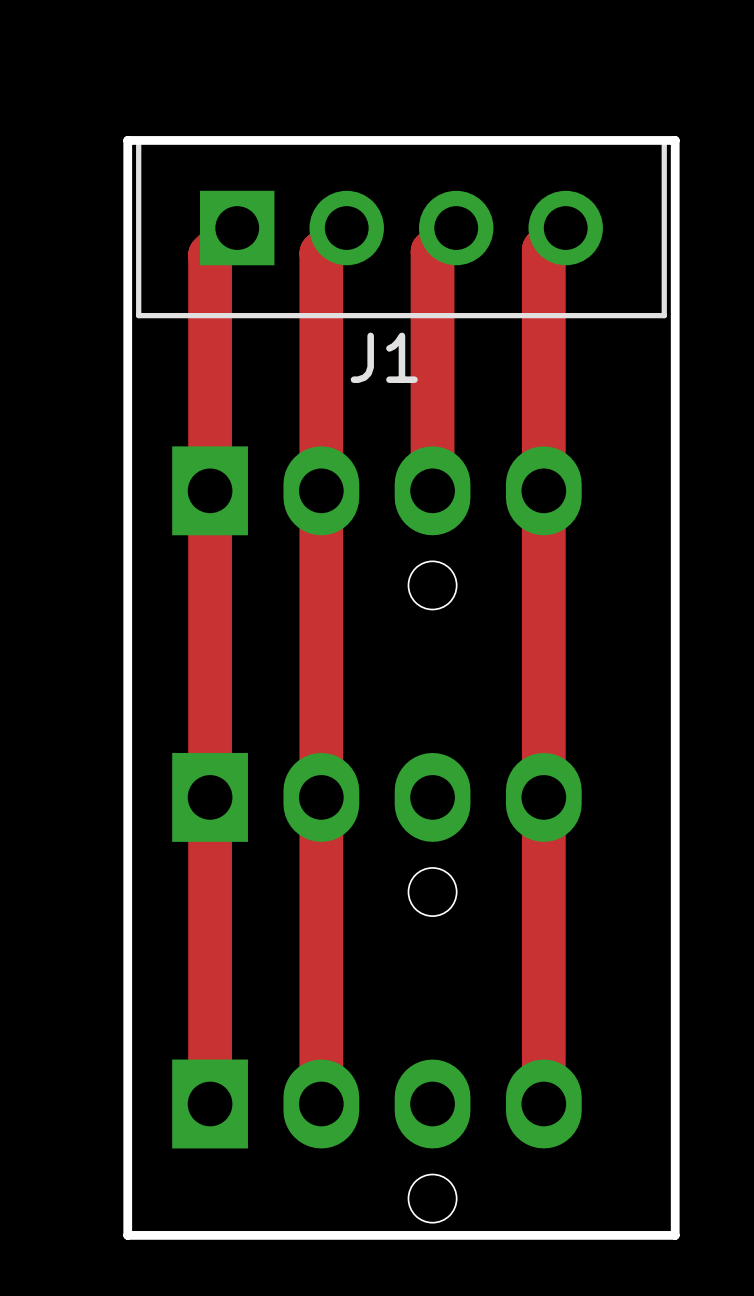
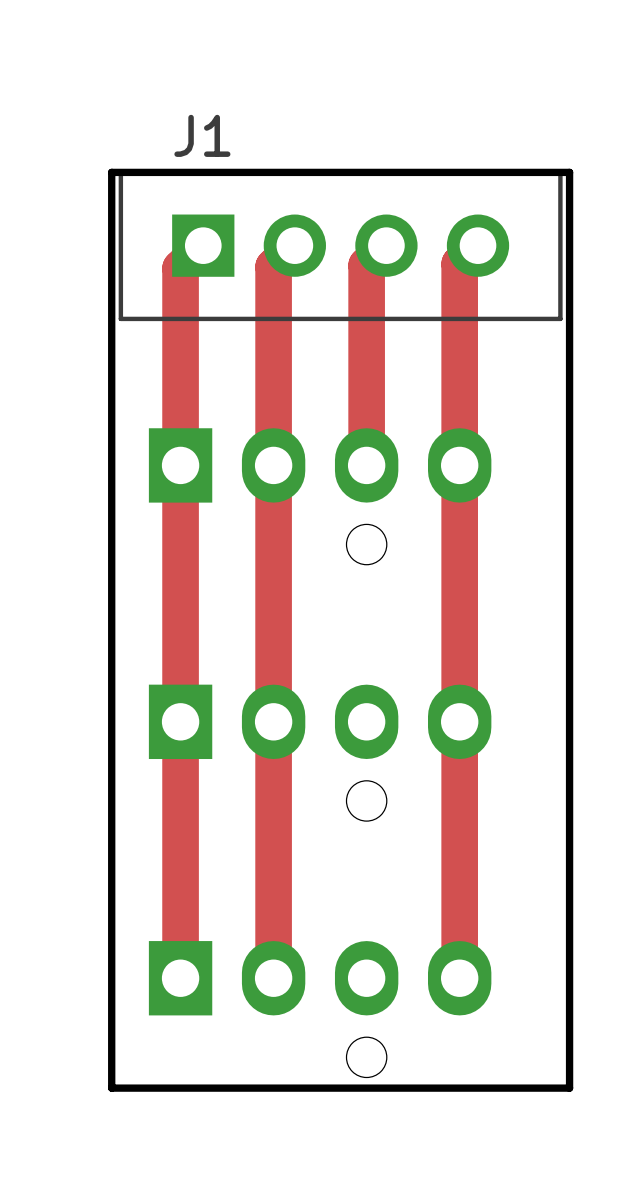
J1 name position: J1 (384, 357) -> J1 (202, 135)

